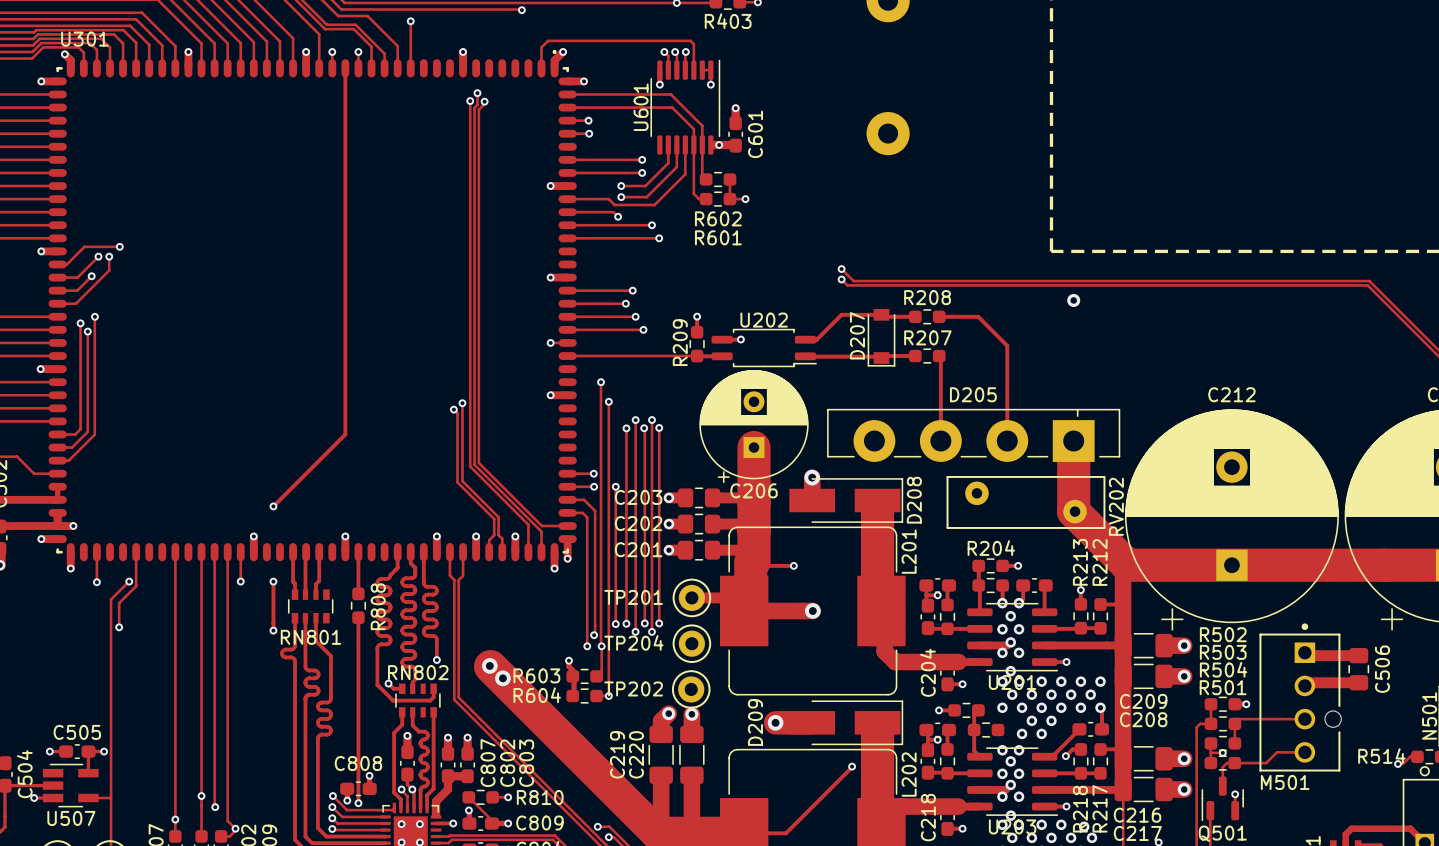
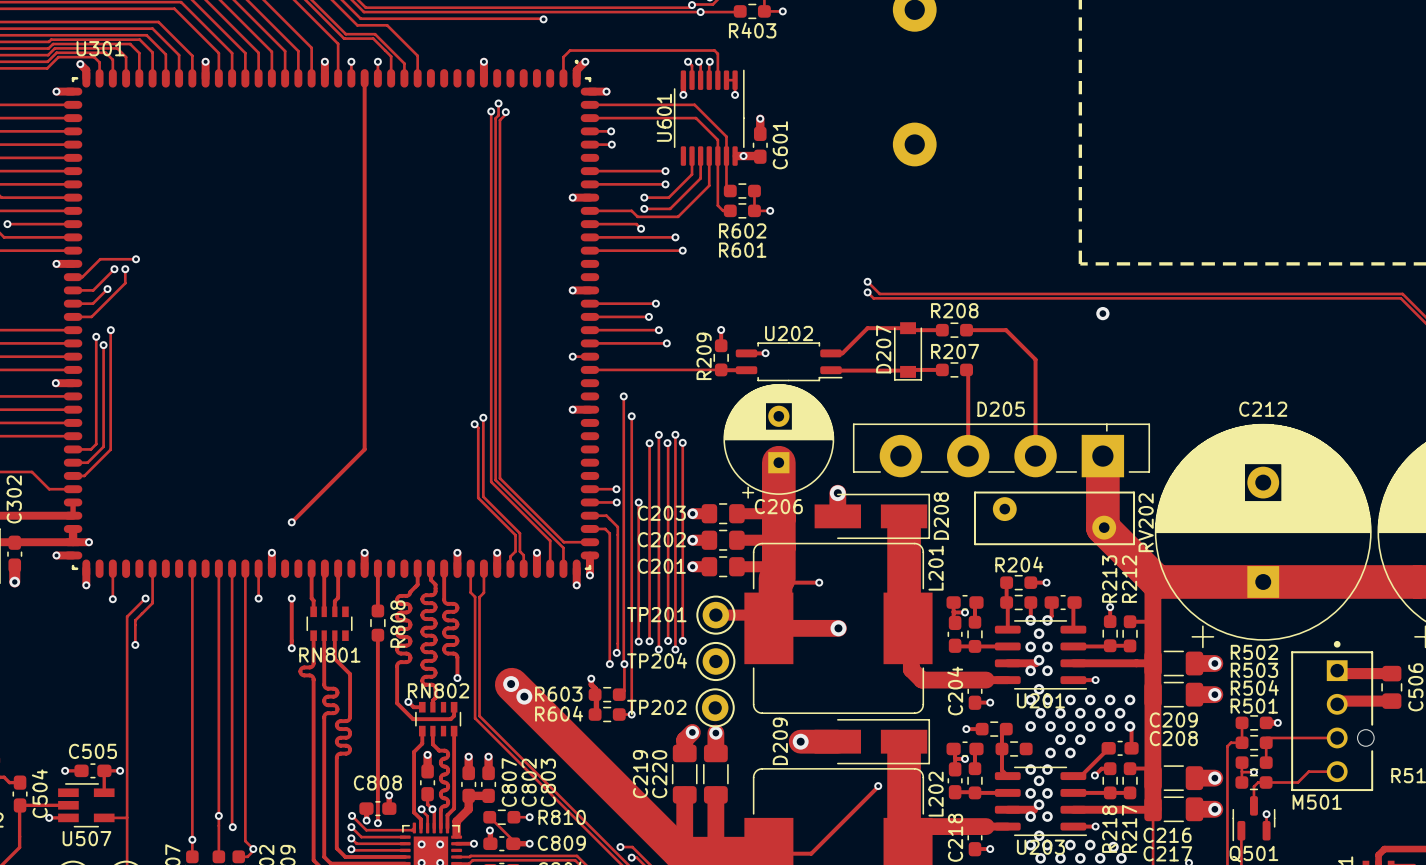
track: (410, 21) (410, 68) -> none
via: (410, 21) -> none

